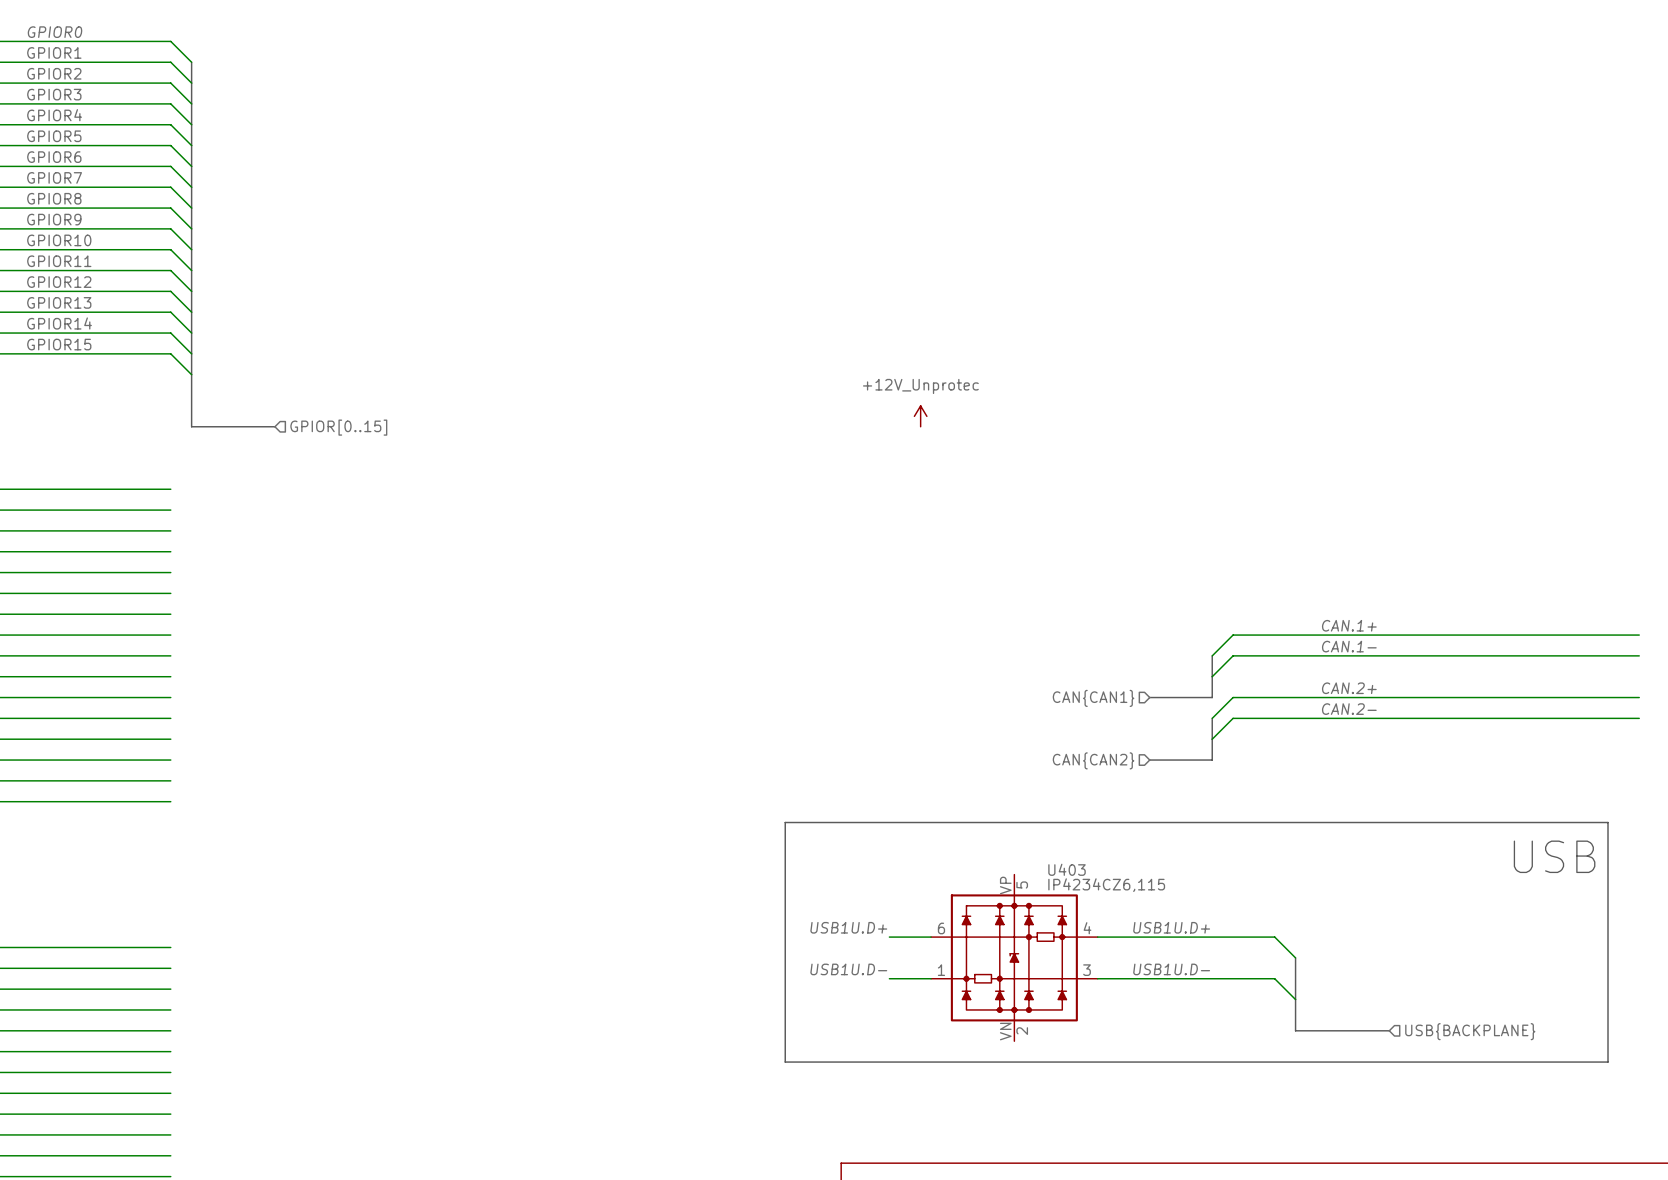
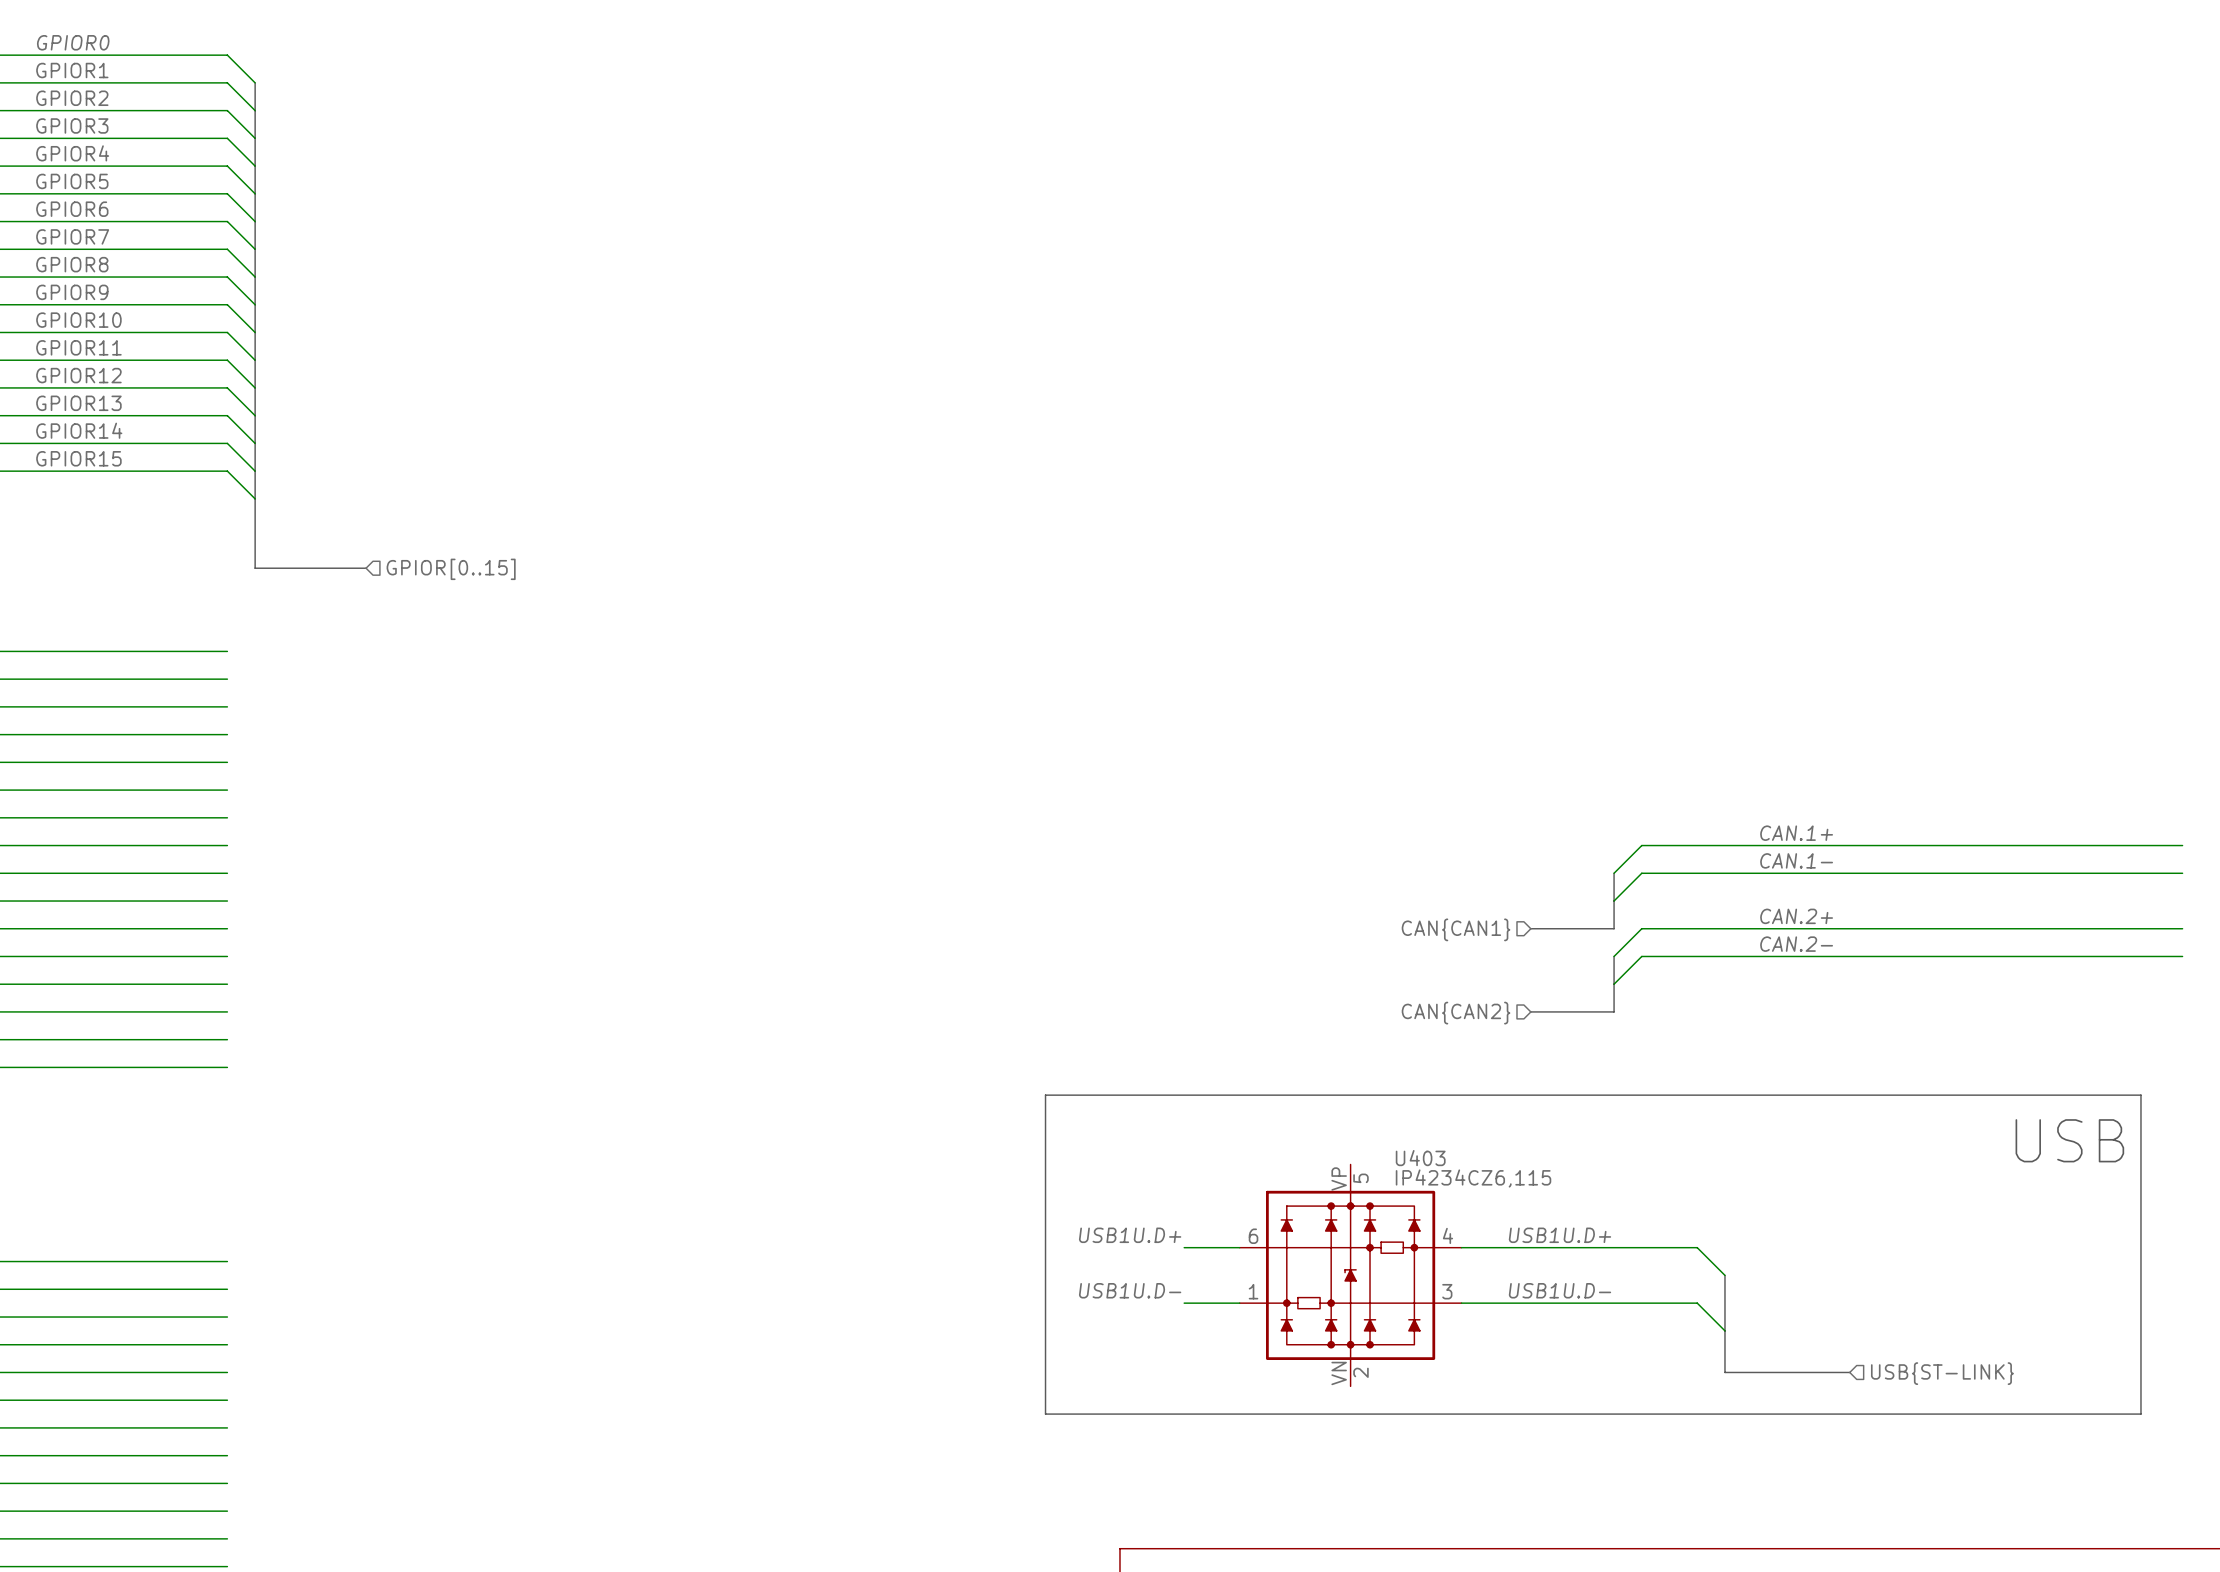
power symbol: +12V_Unprotec (920, 416) -> none
hierarchical label: USB{BACKPLANE} (1470, 1031) -> USB{ST-LINK} (1942, 1373)

